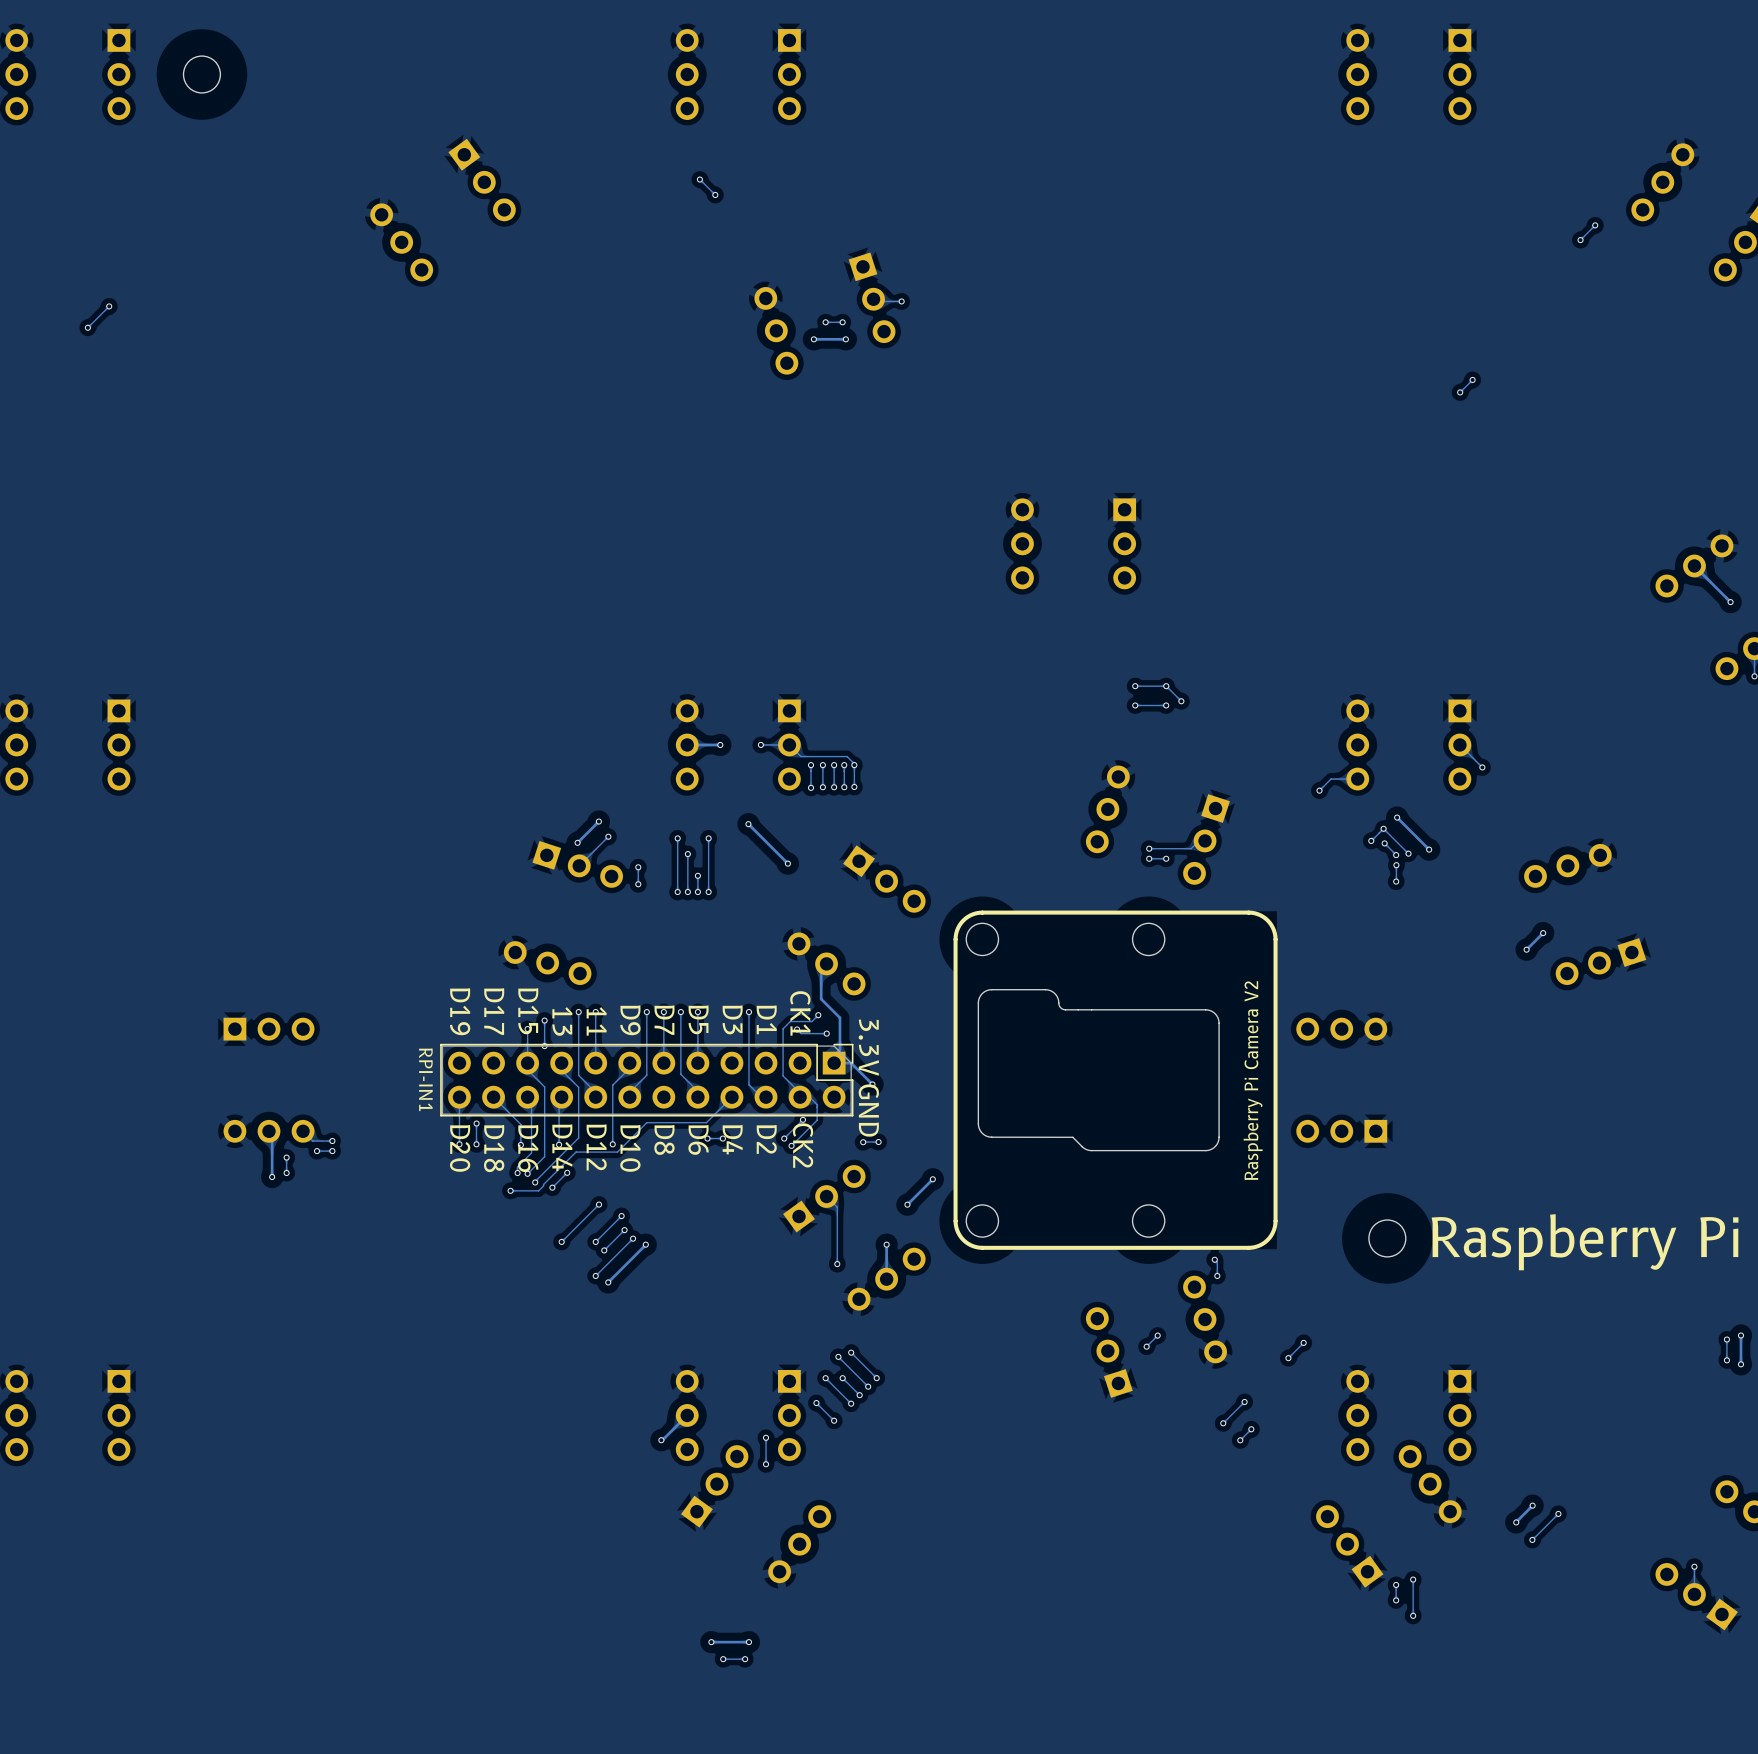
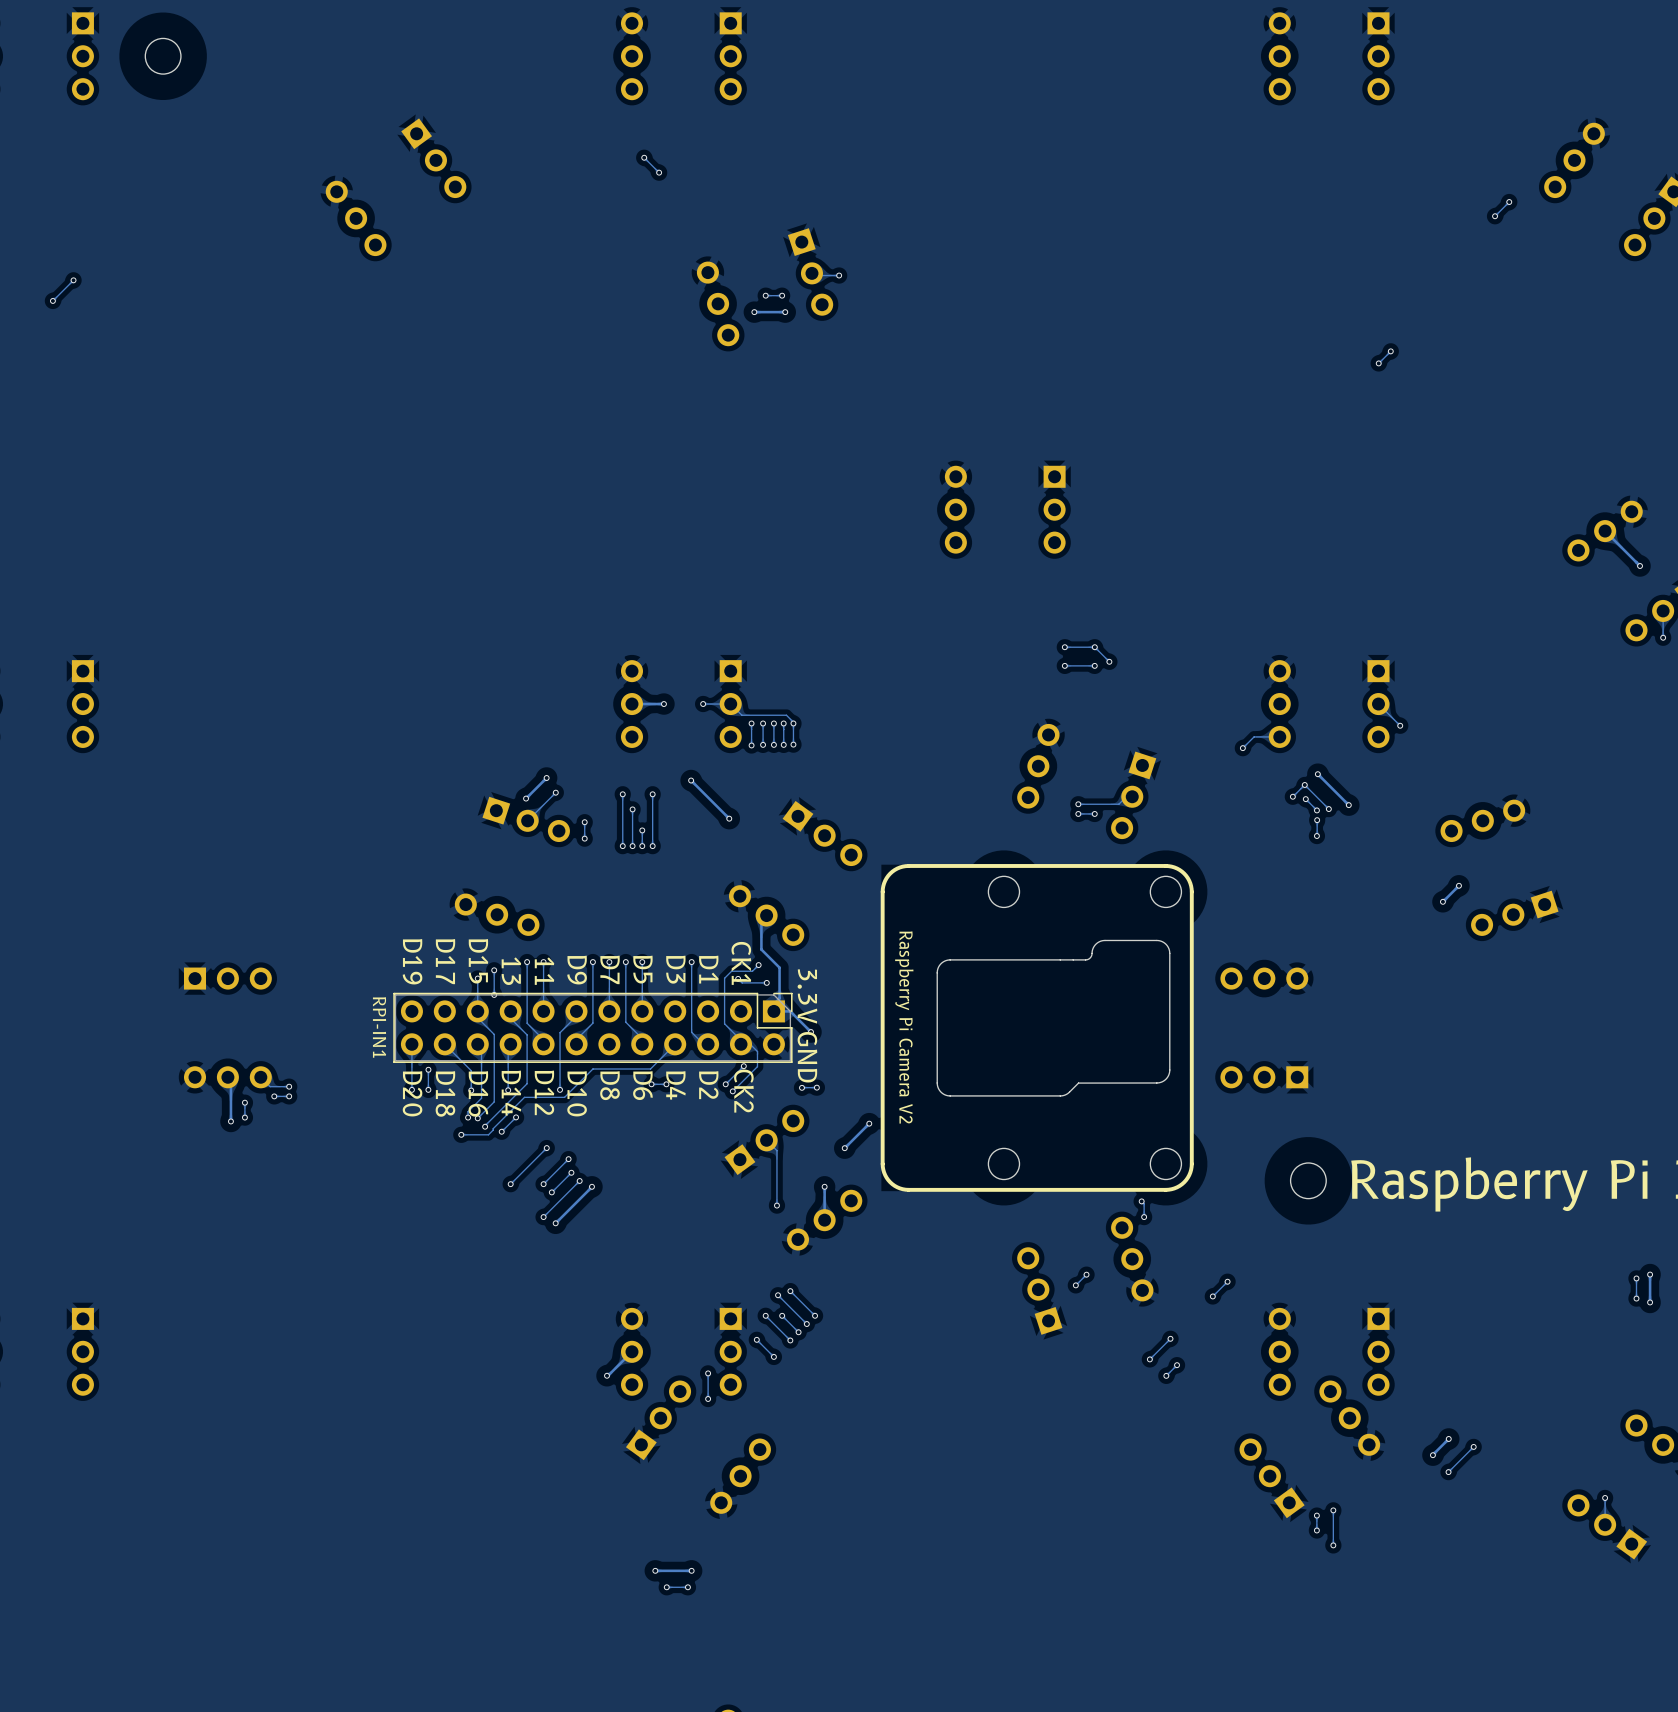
part footprint: [953, 910, 1278, 1250] -> [880, 864, 1194, 1192]
part value position: Raspberry Pi Camera V2 (1253, 1080) -> Raspberry Pi Camera V2 (904, 1027)

